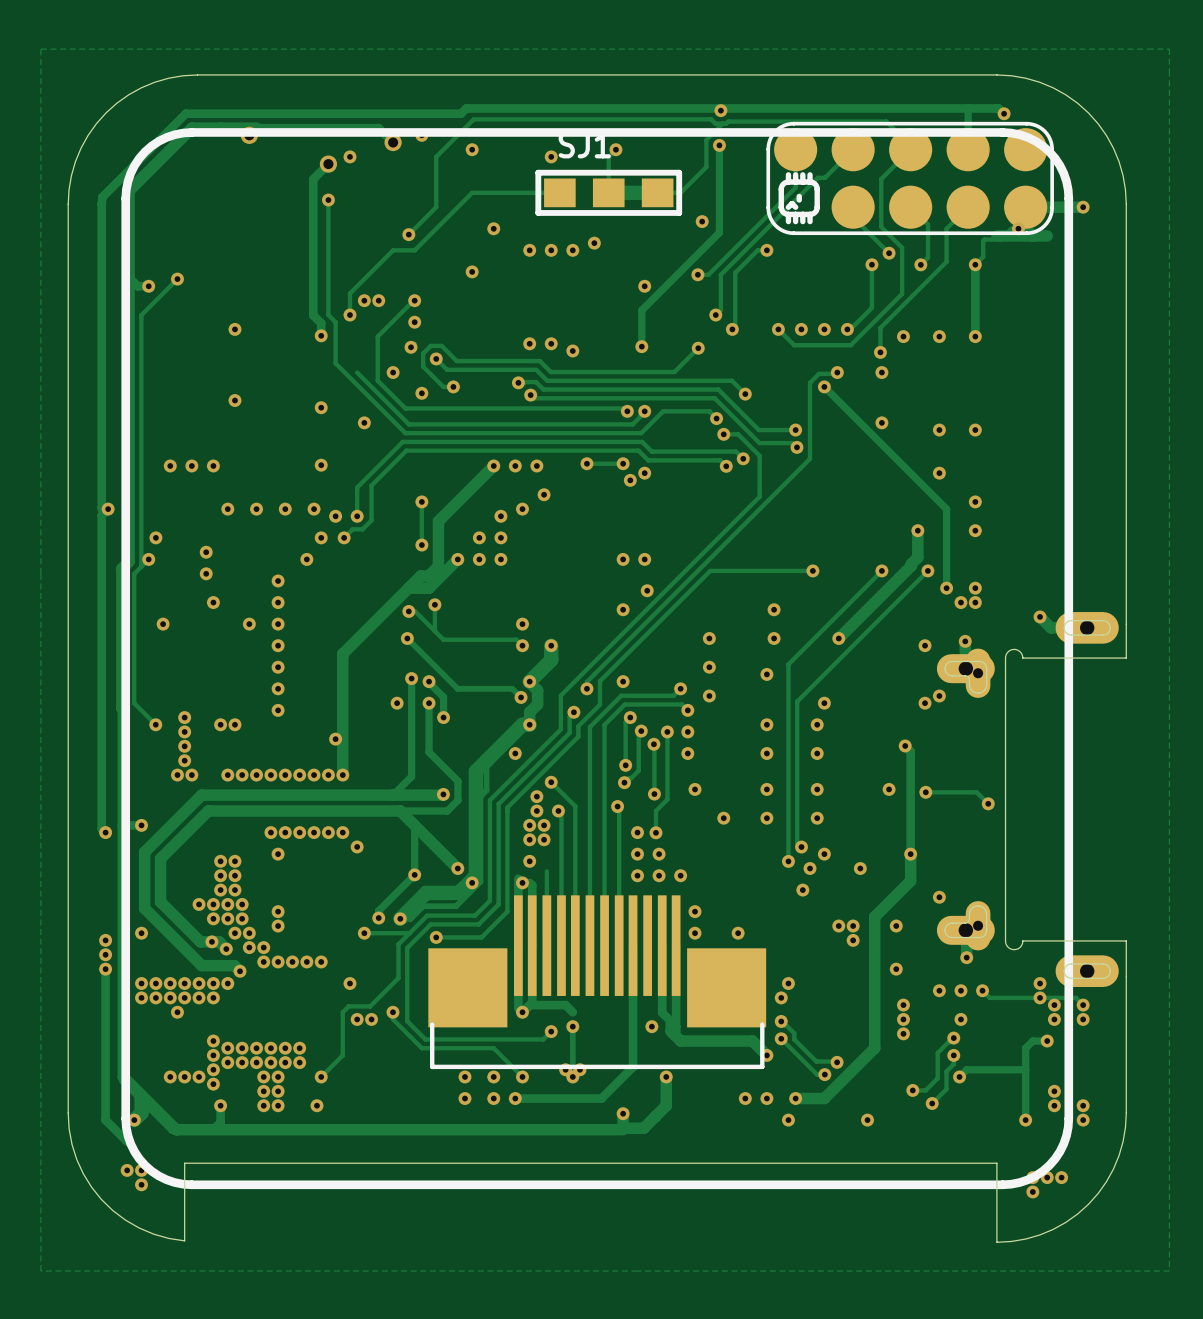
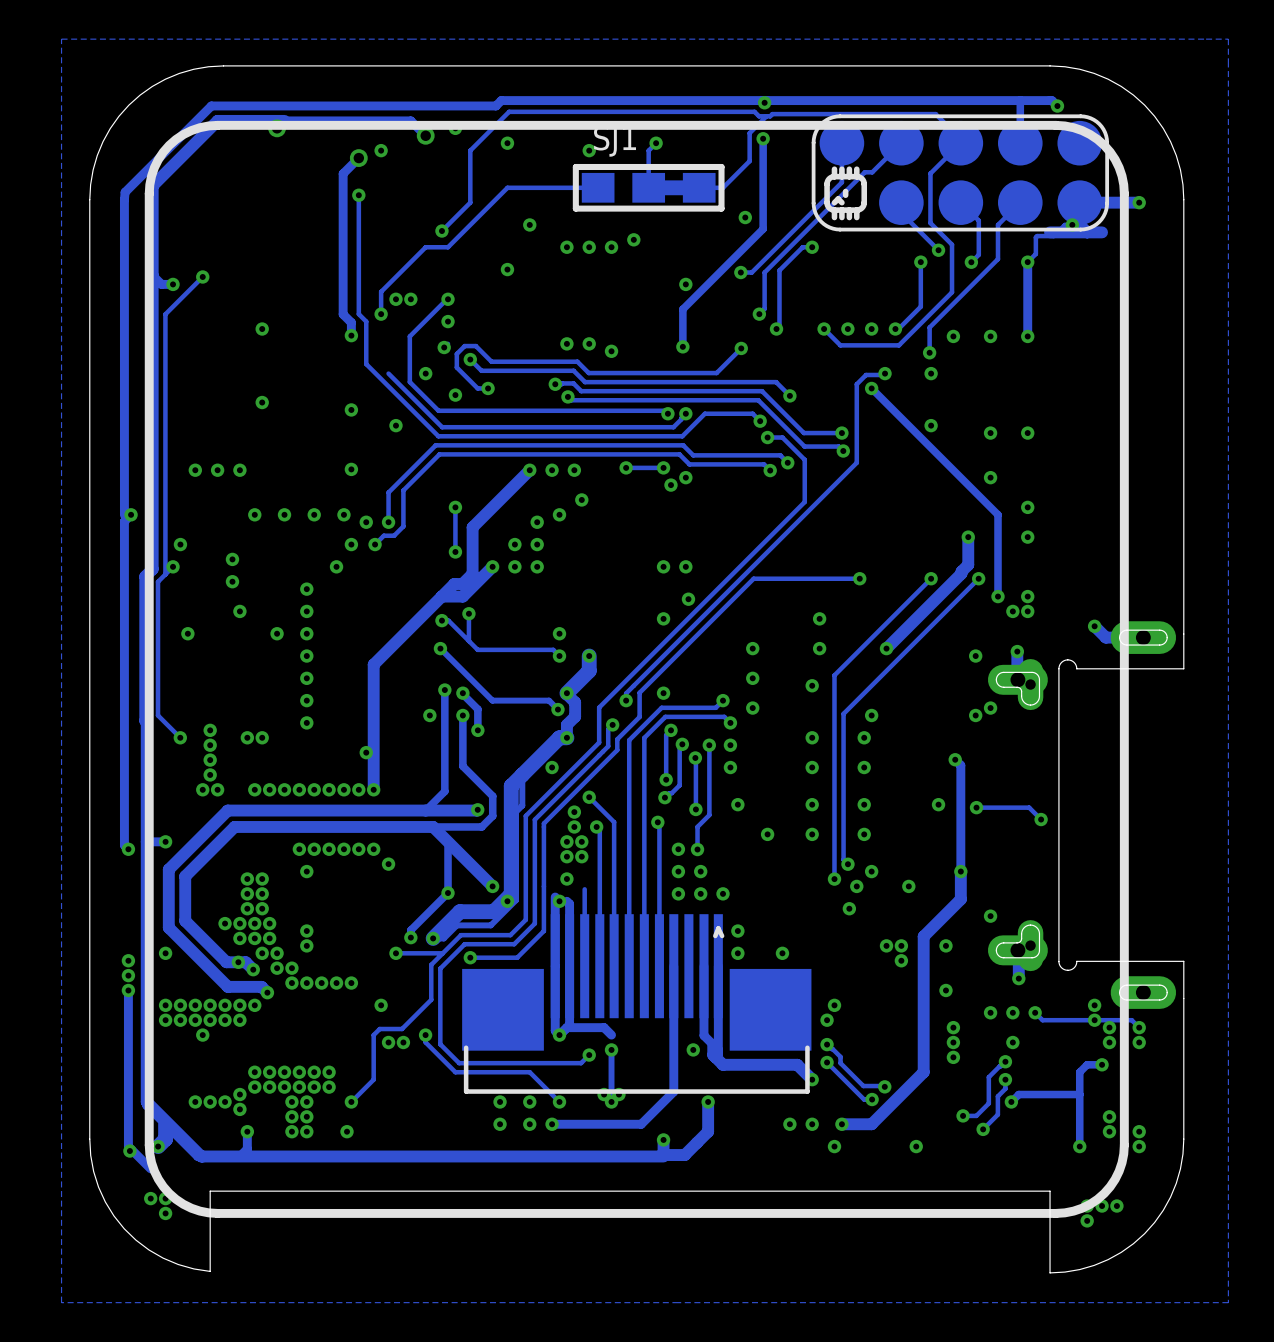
part footprint: [428, 895, 767, 1070] -> [462, 914, 812, 1094]
via: (213, 1041) -> none
via: (213, 1055) -> none
via: none -> (129, 1151)

